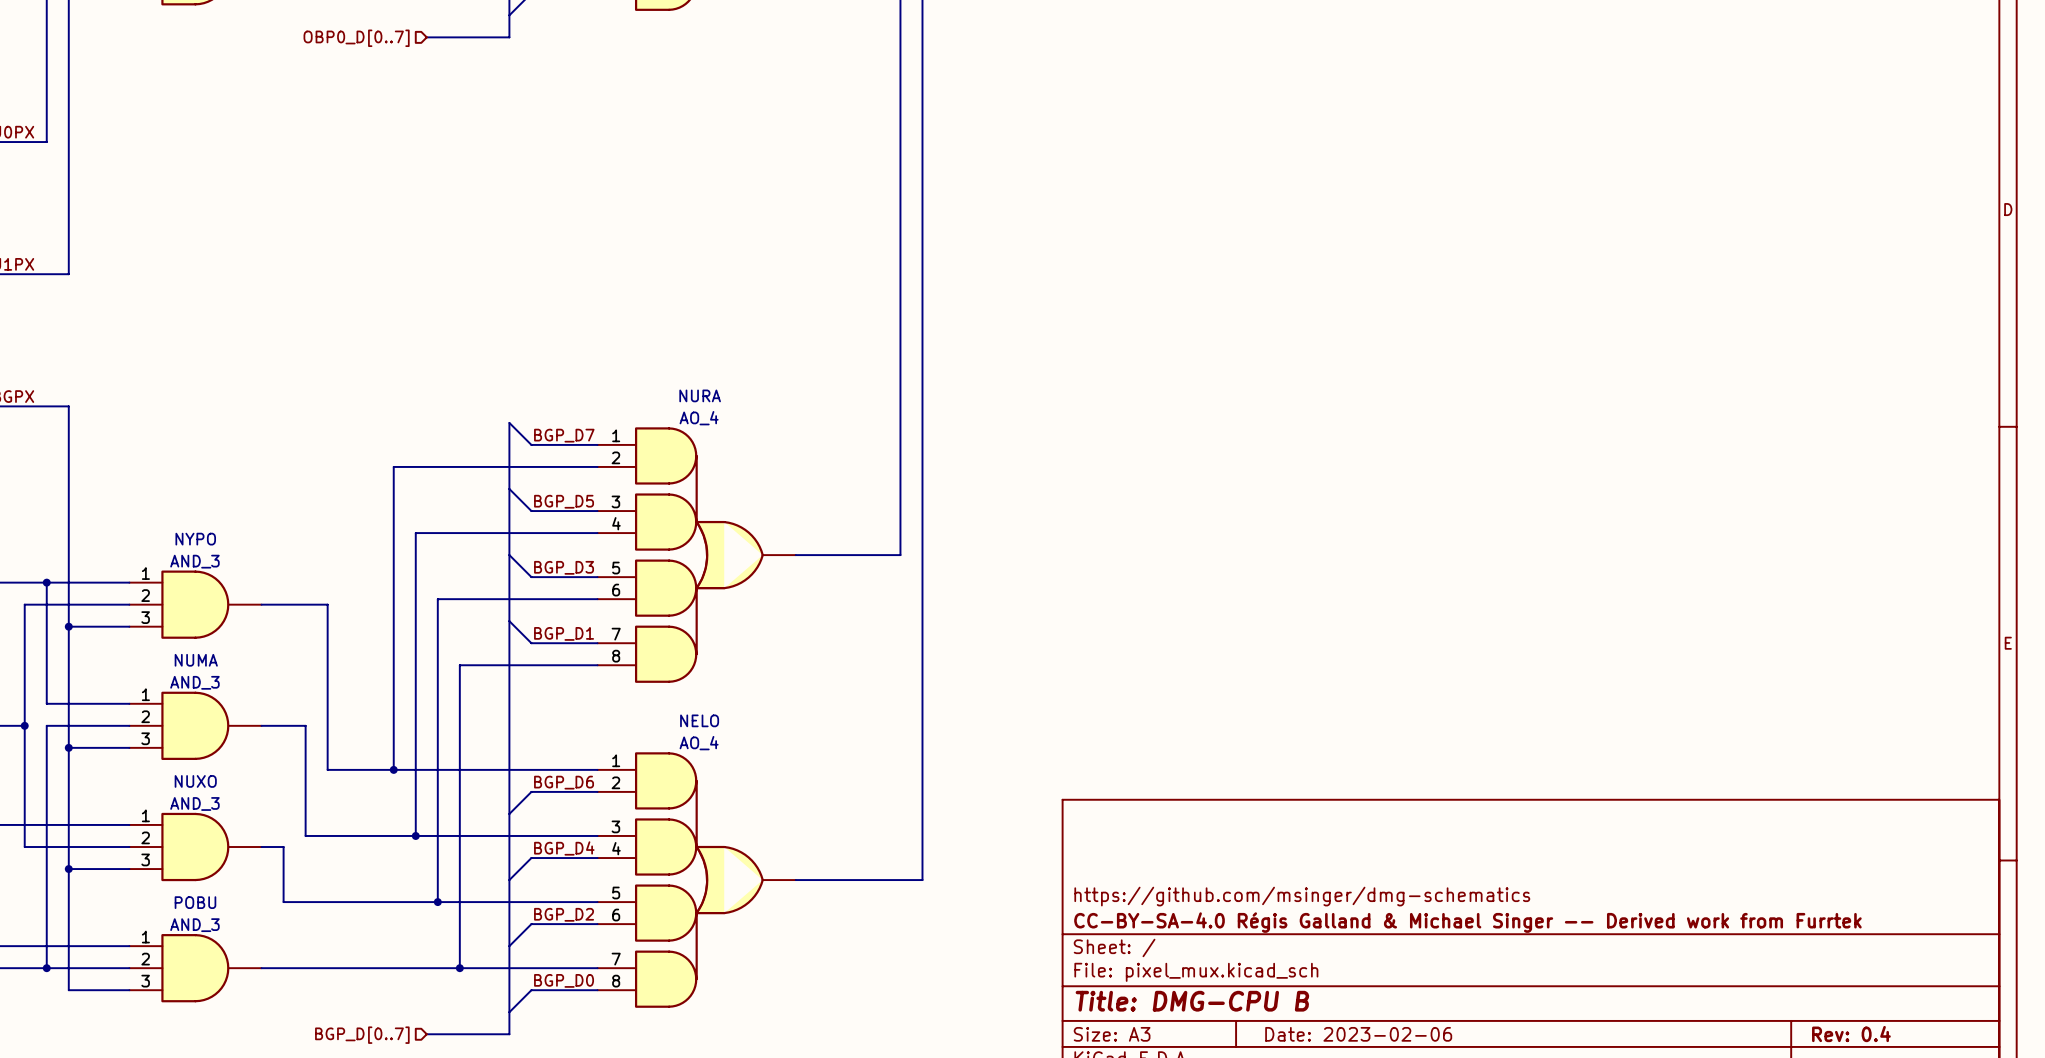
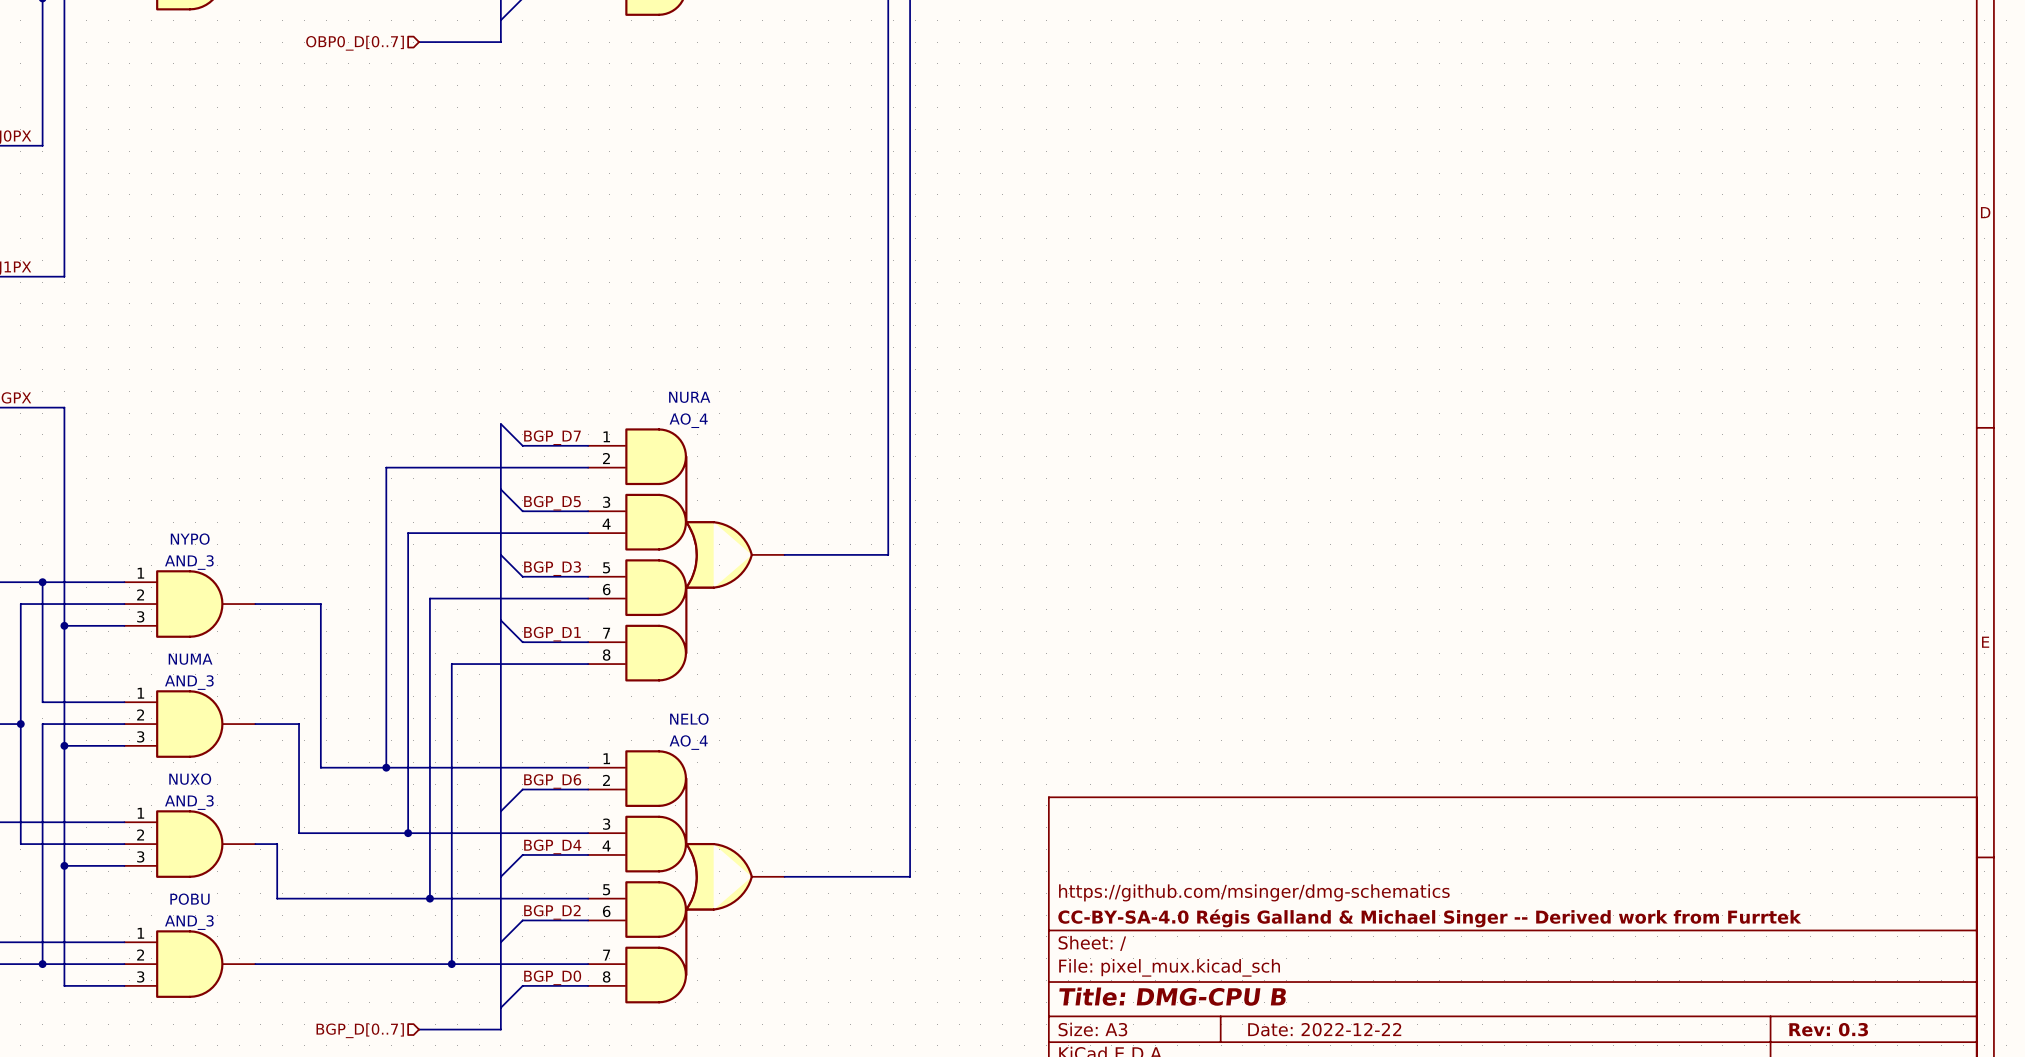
title block: Date: 2023-02-06 (1358, 1034) -> Date: 2022-12-22 (1324, 1029)
title block: Rev: 0.4 (1851, 1034) -> Rev: 0.3 (1828, 1029)

